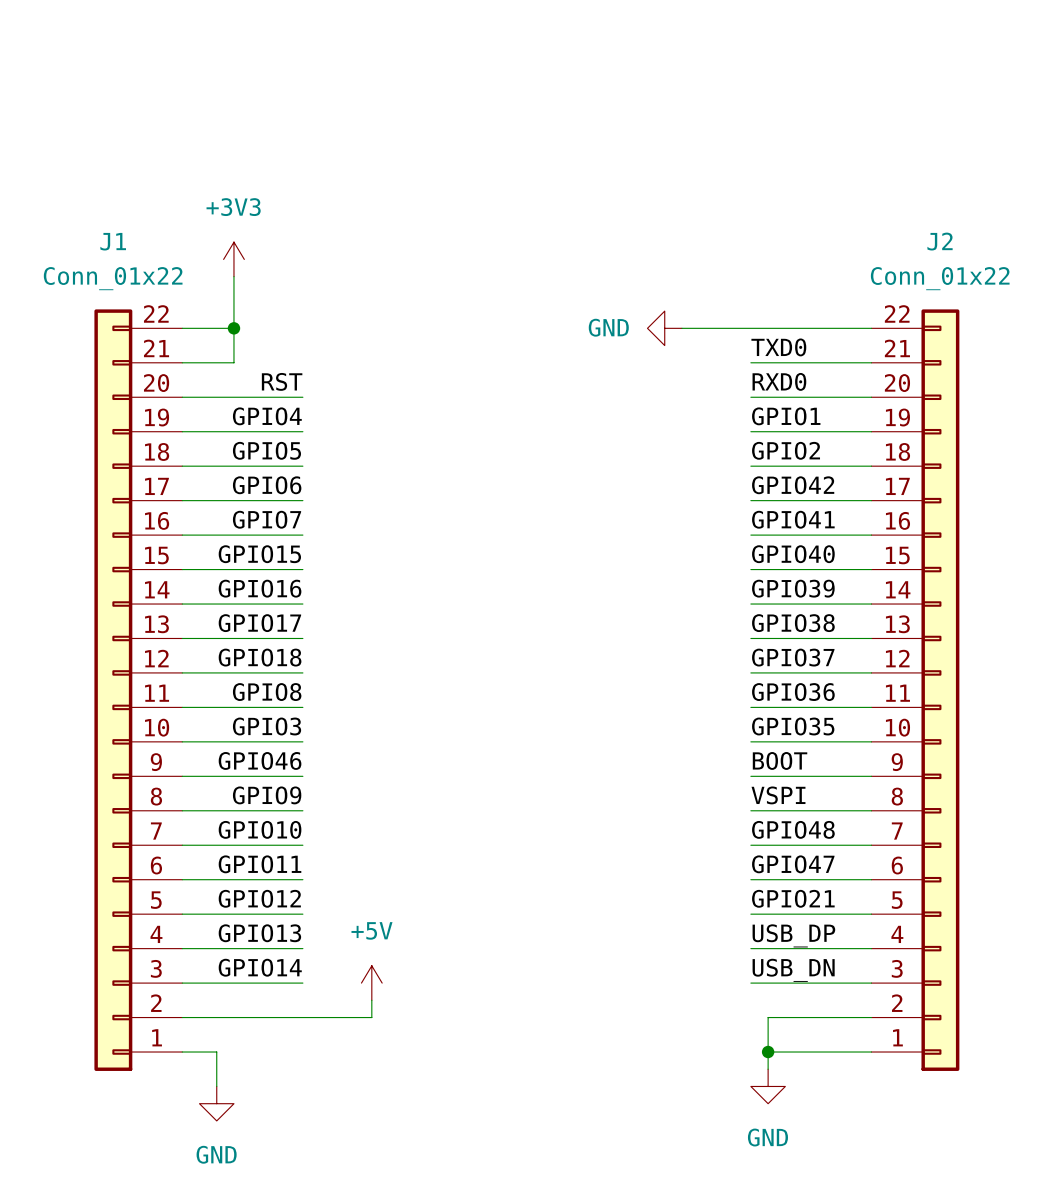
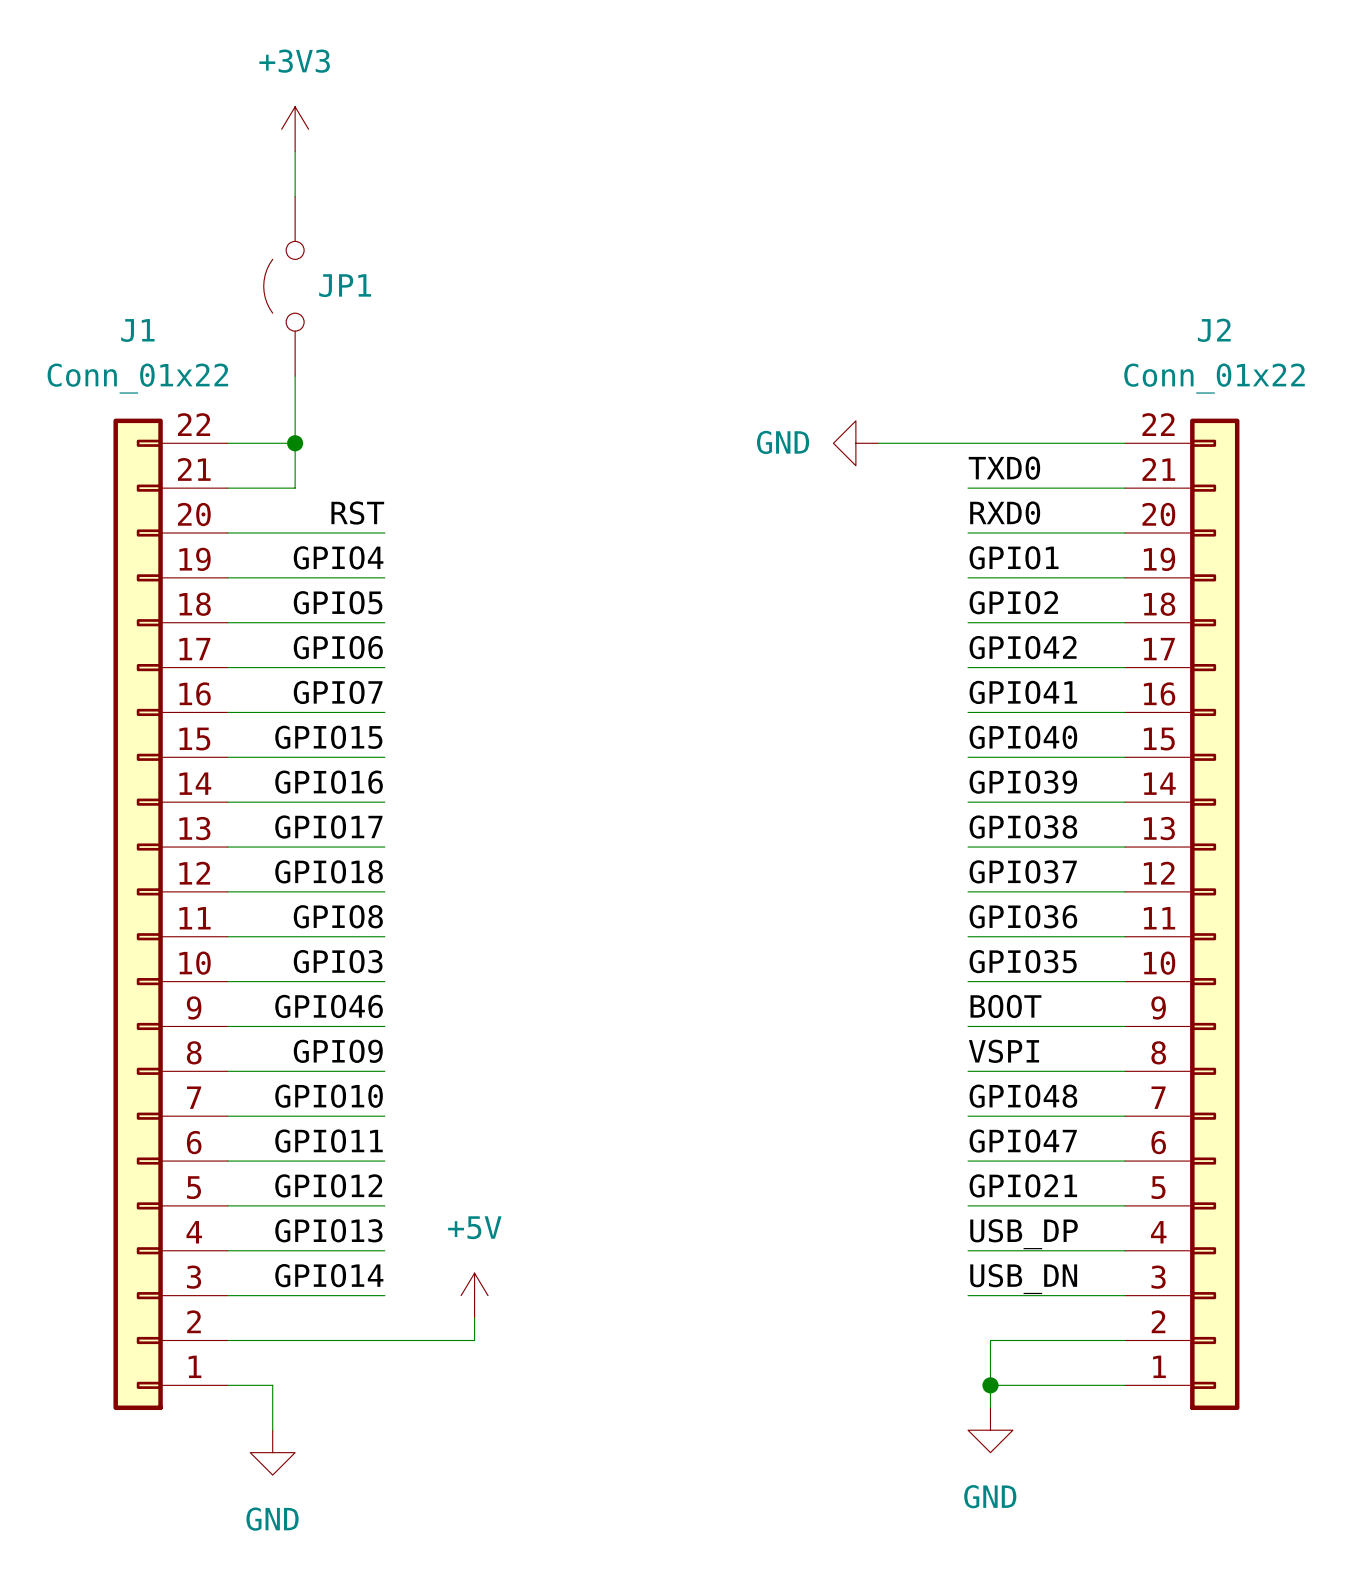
wire: none -> (295, 151) (295, 196)
JP1: none -> (283, 286)
power symbol position: +3V3 (233, 259) -> +3V3 (295, 129)

